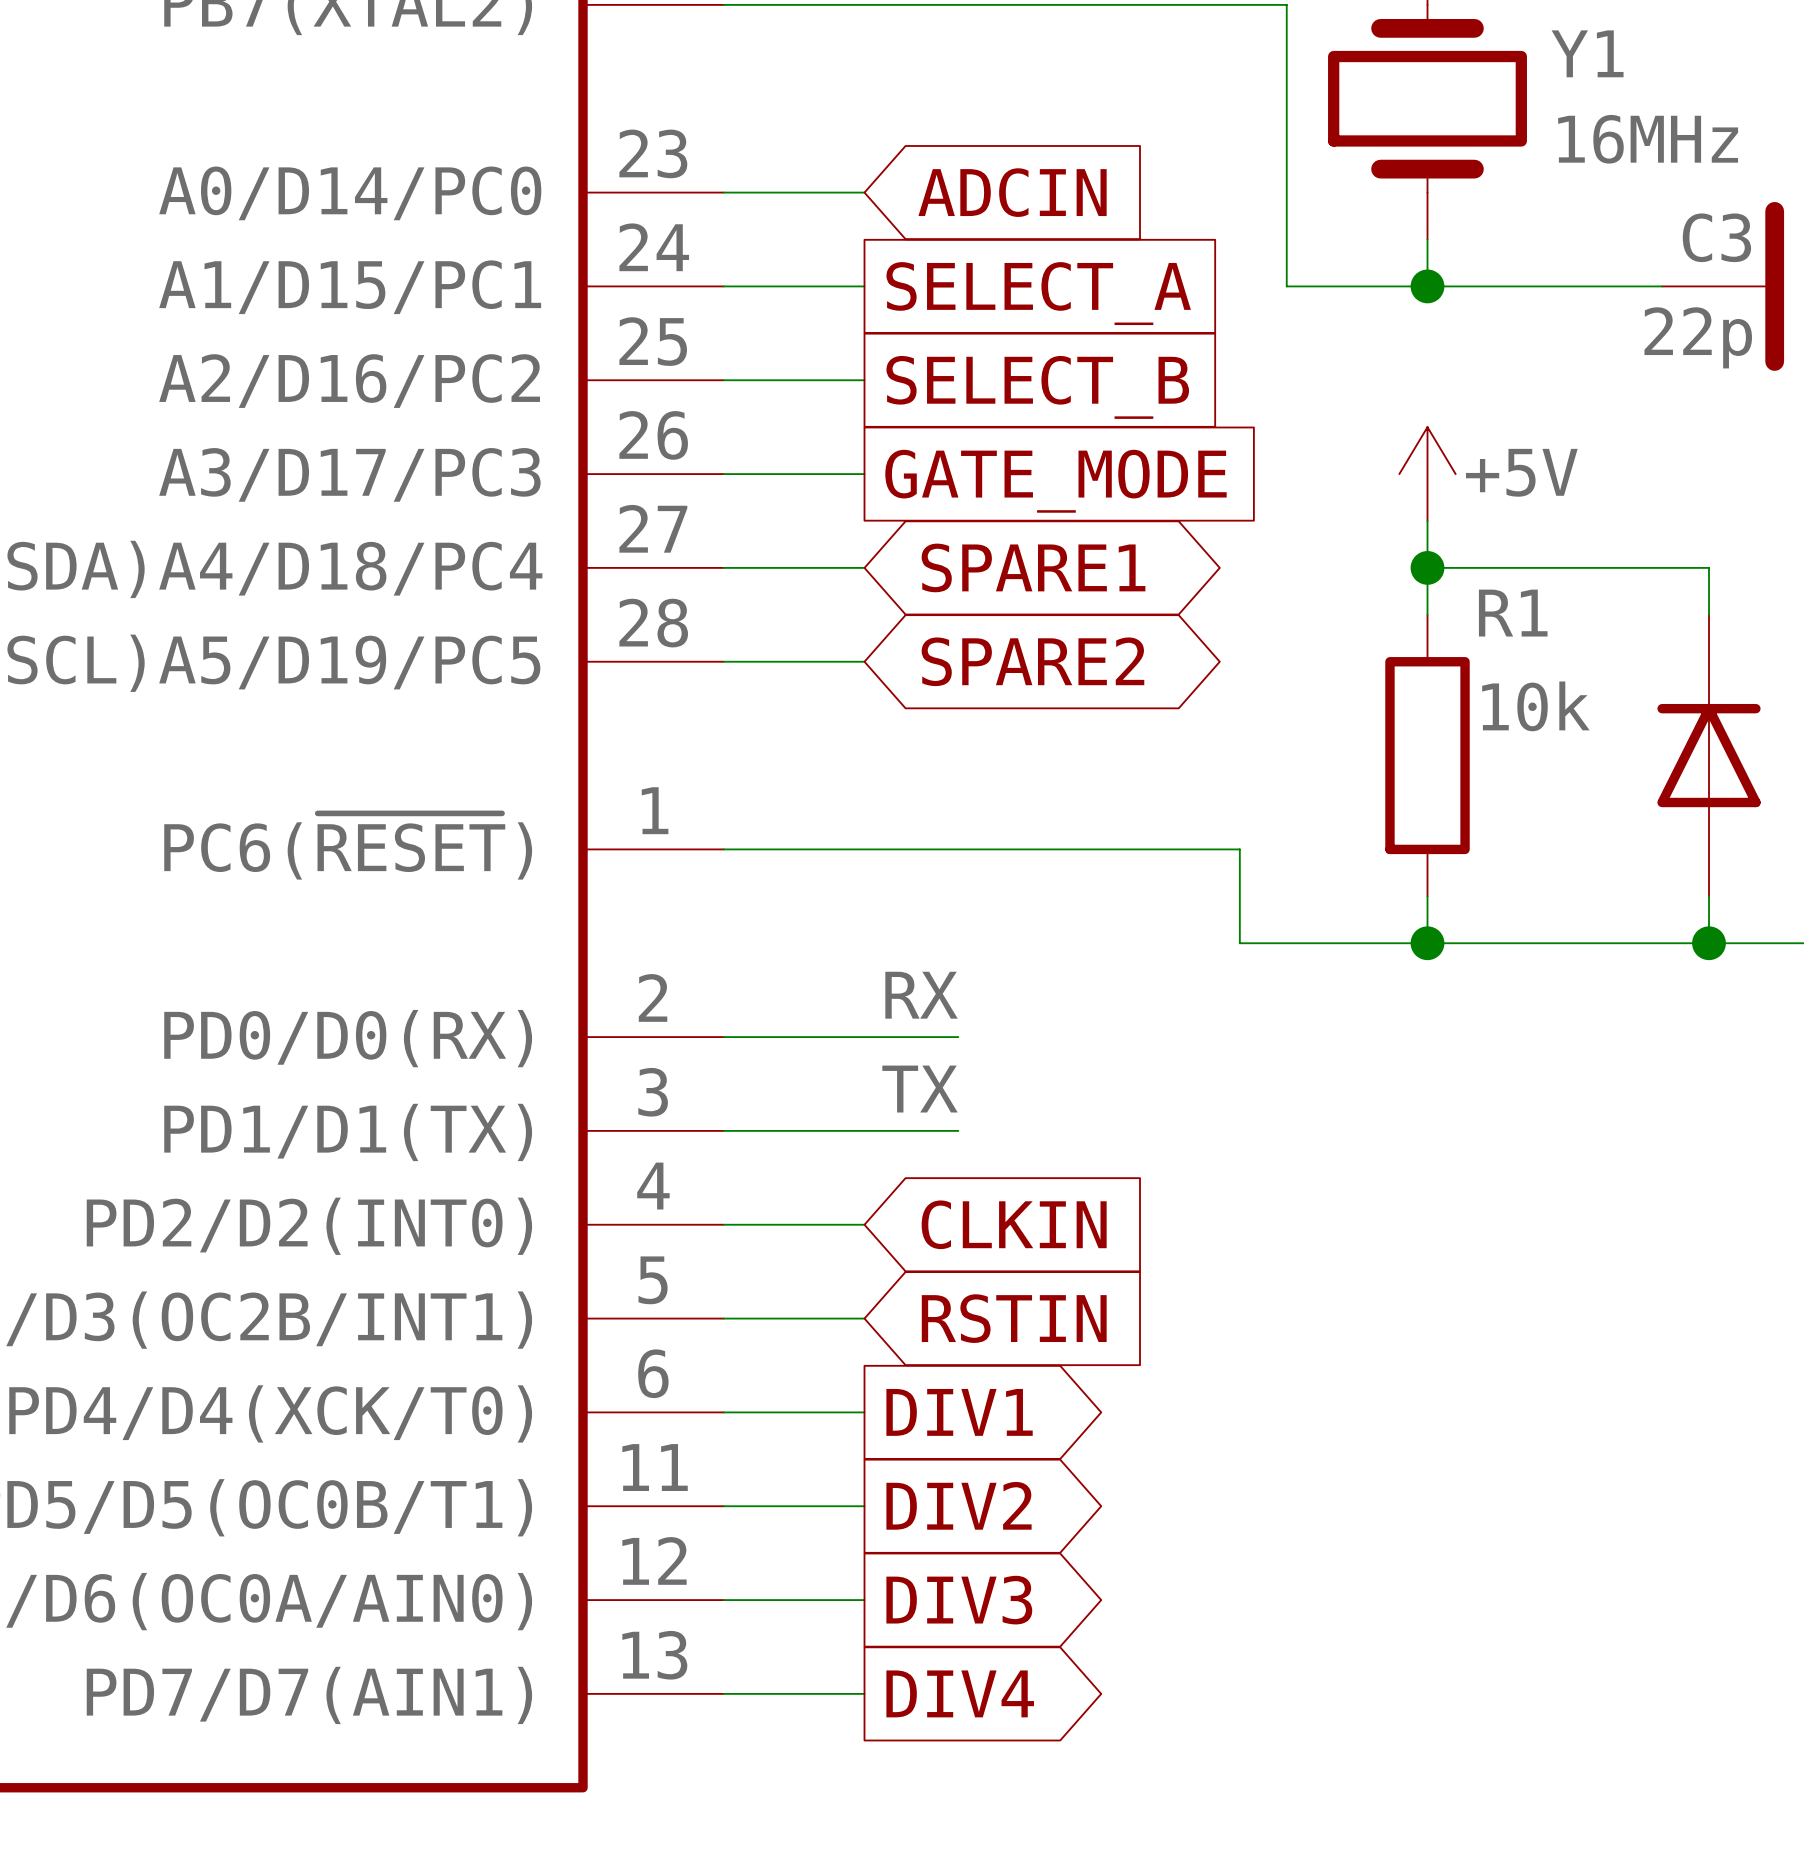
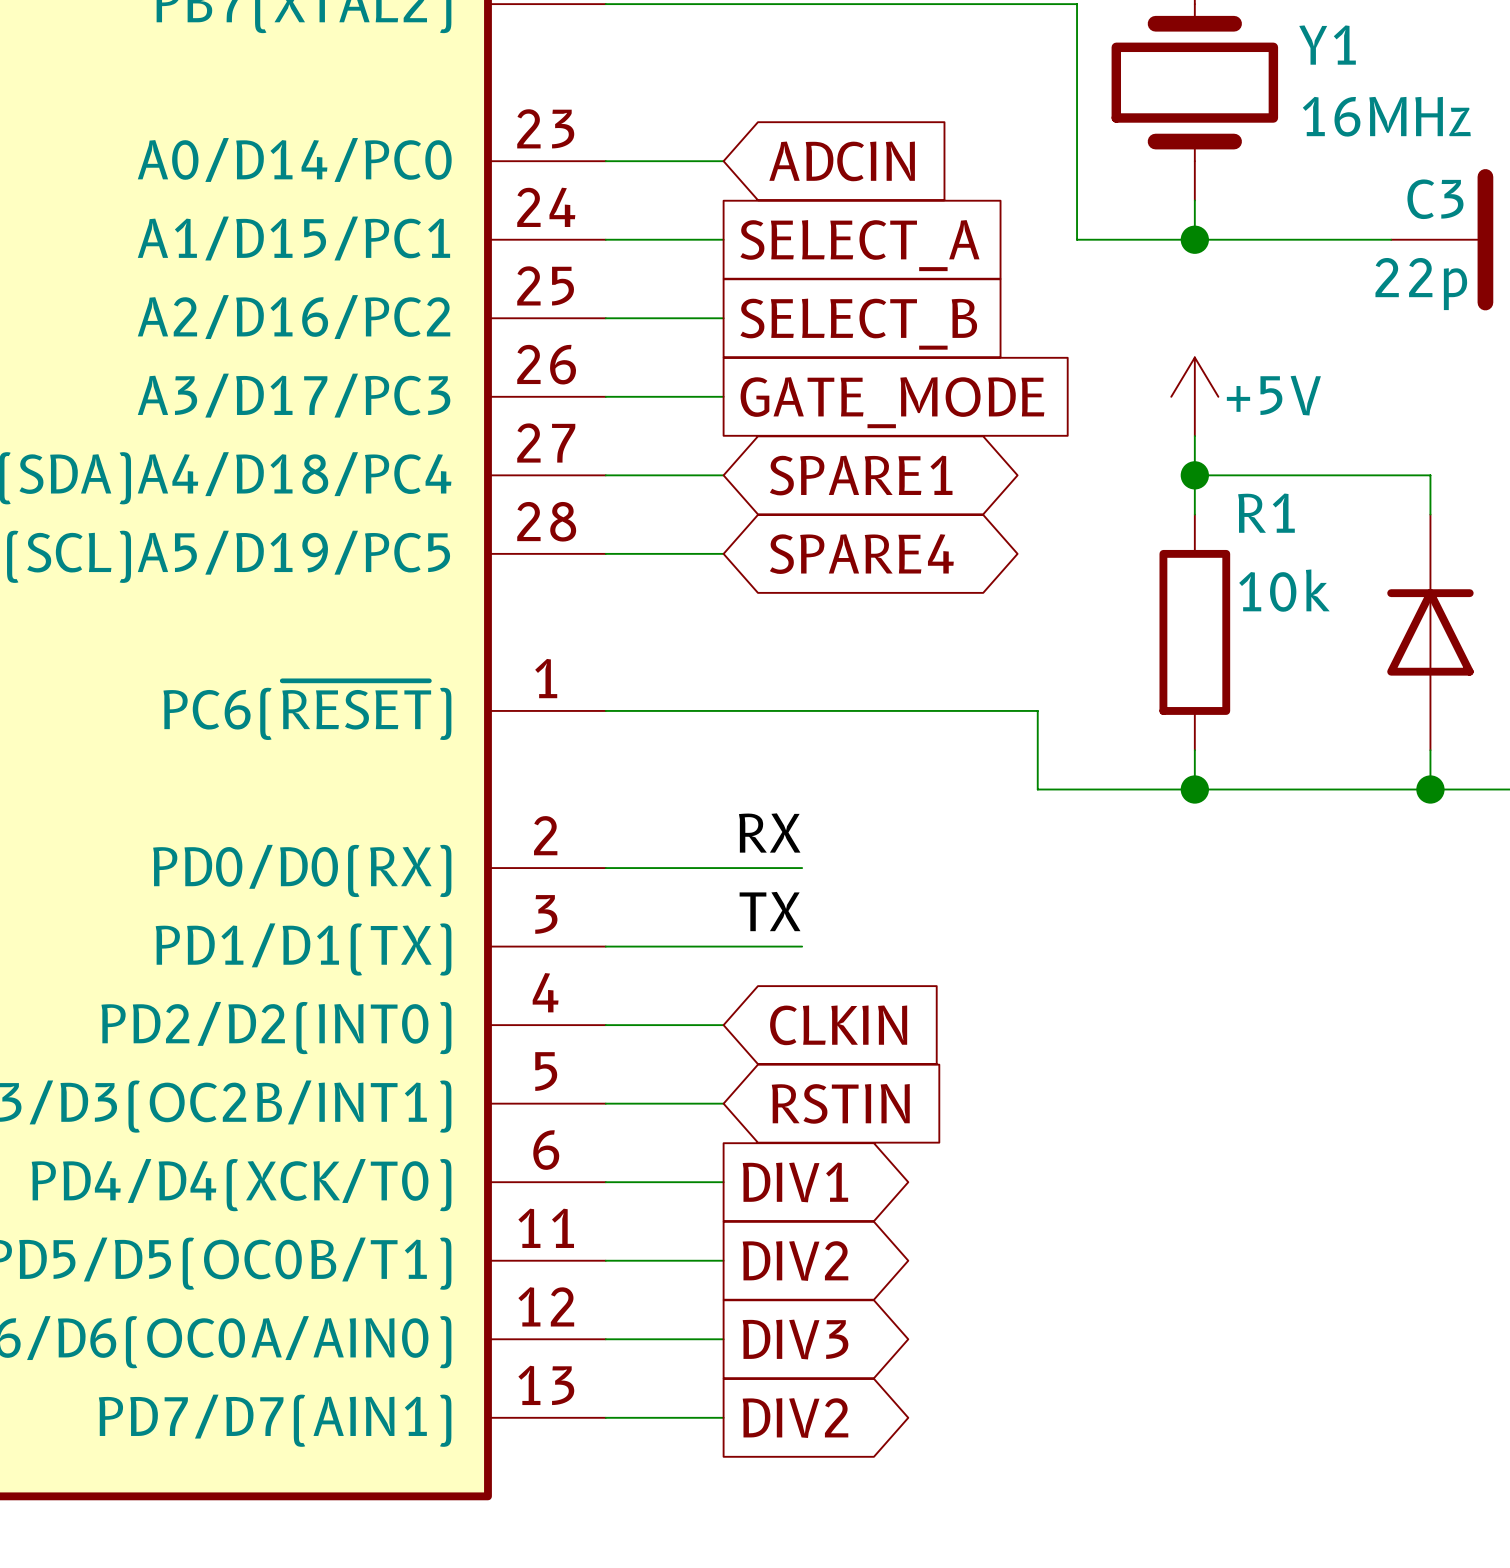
global label: SPARE2 (1032, 661) -> SPARE4 (861, 554)
global label: DIV4 (960, 1693) -> DIV2 (795, 1418)

